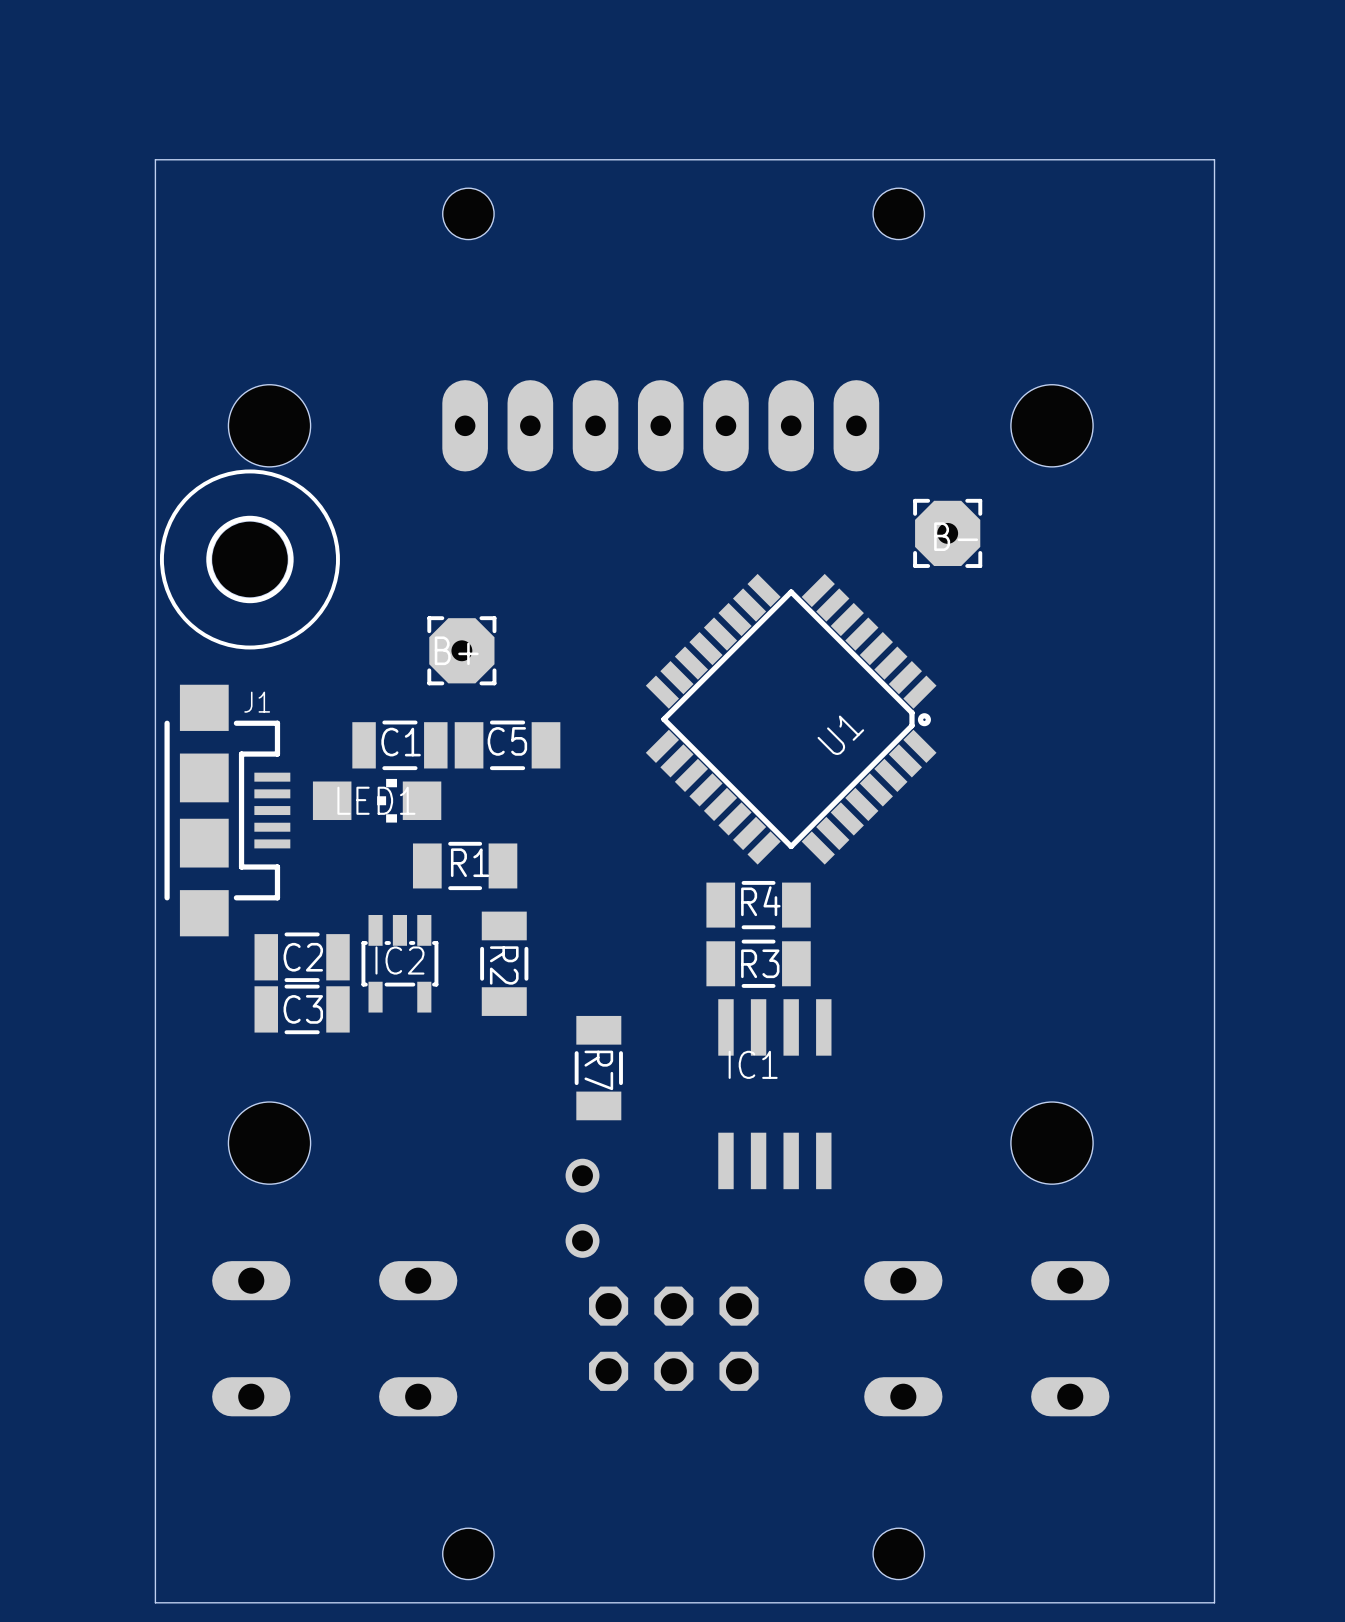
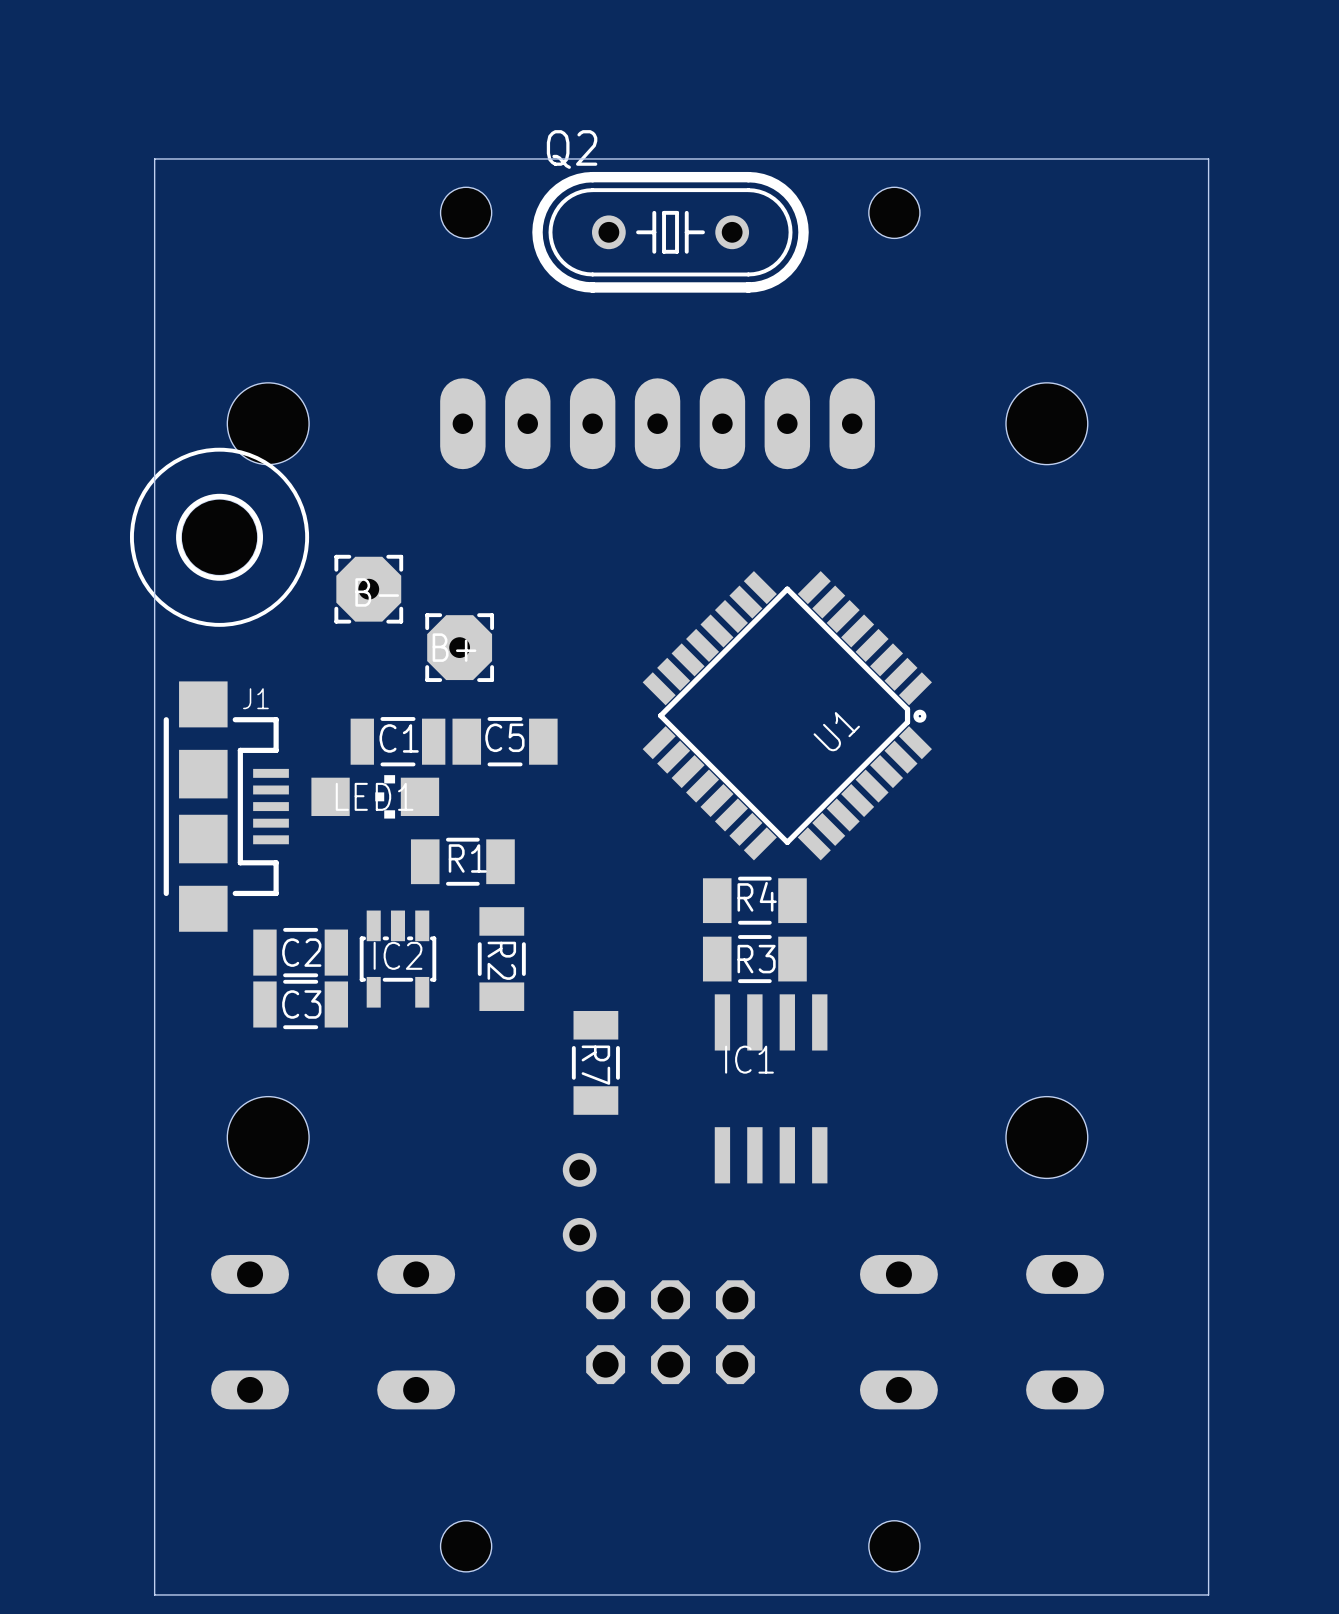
Q2: none -> (670, 232)
part position: (947, 533) -> (368, 589)
part position: (249, 559) -> (219, 537)

